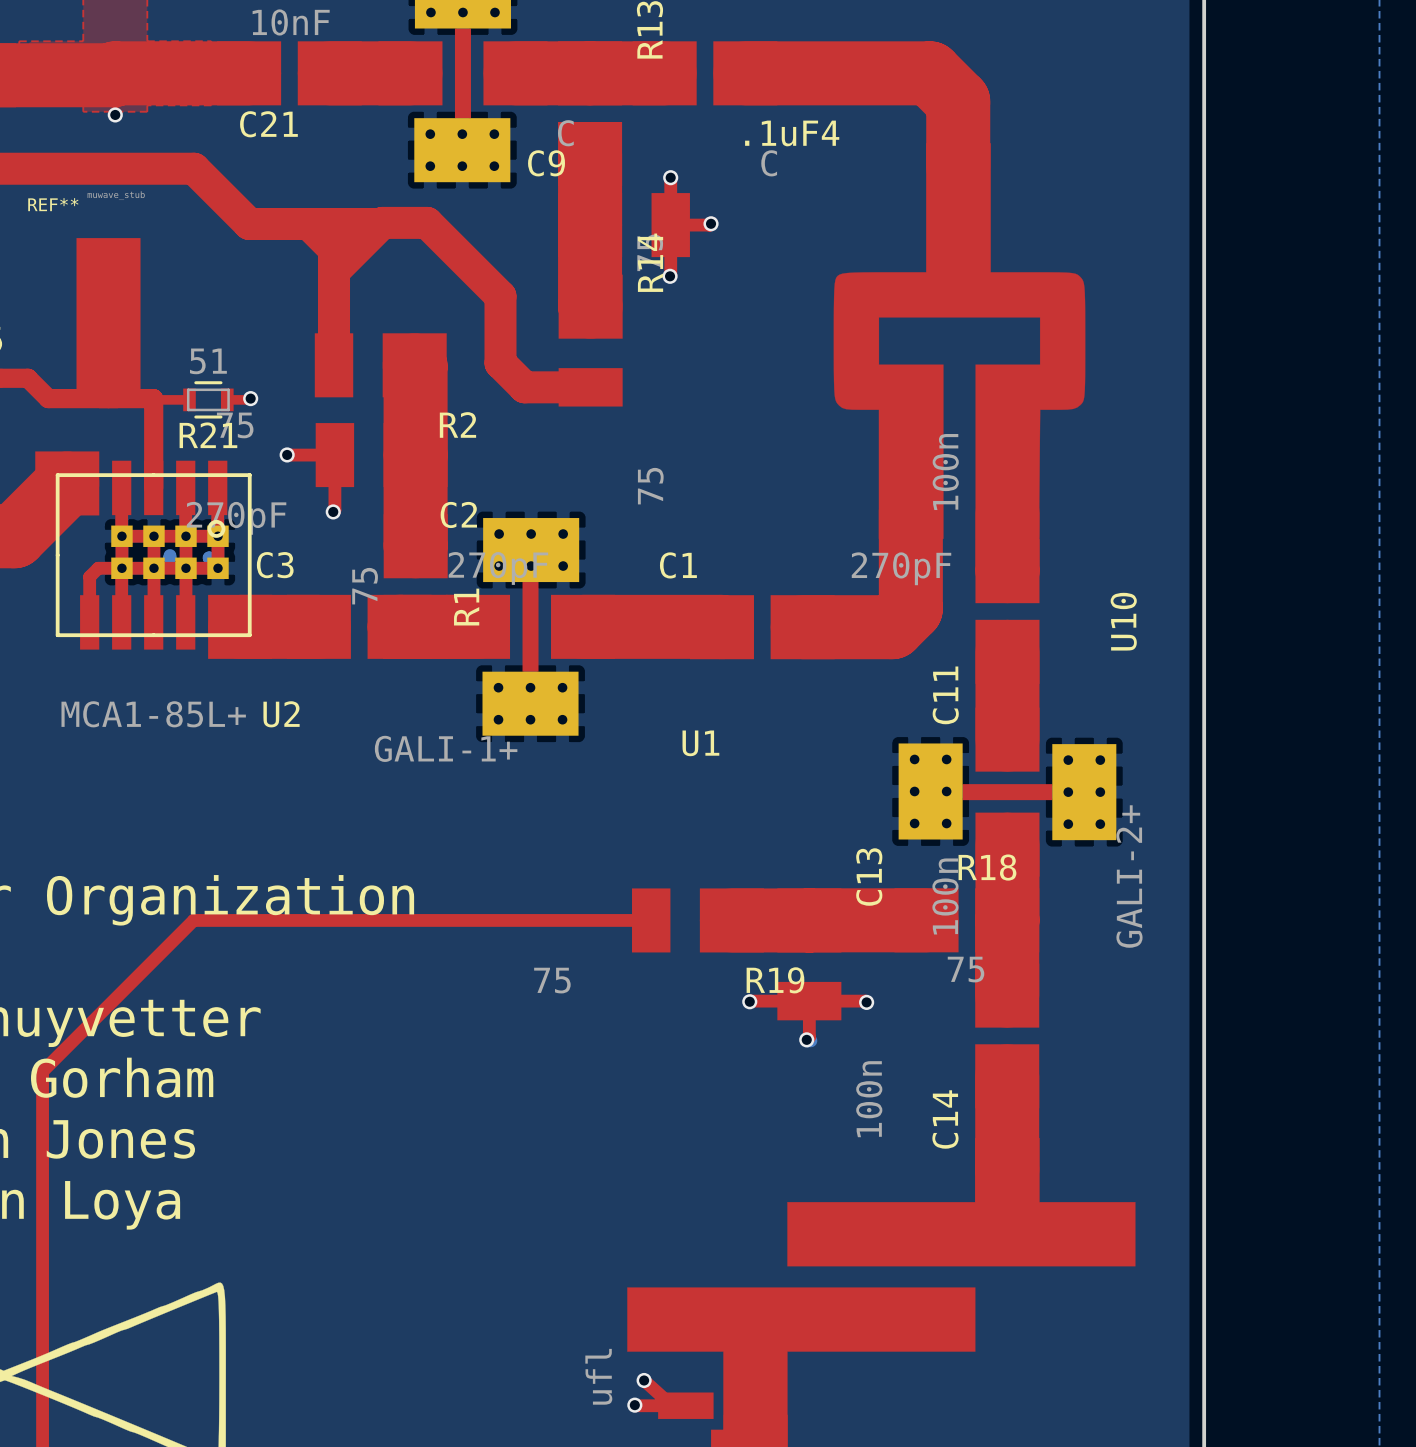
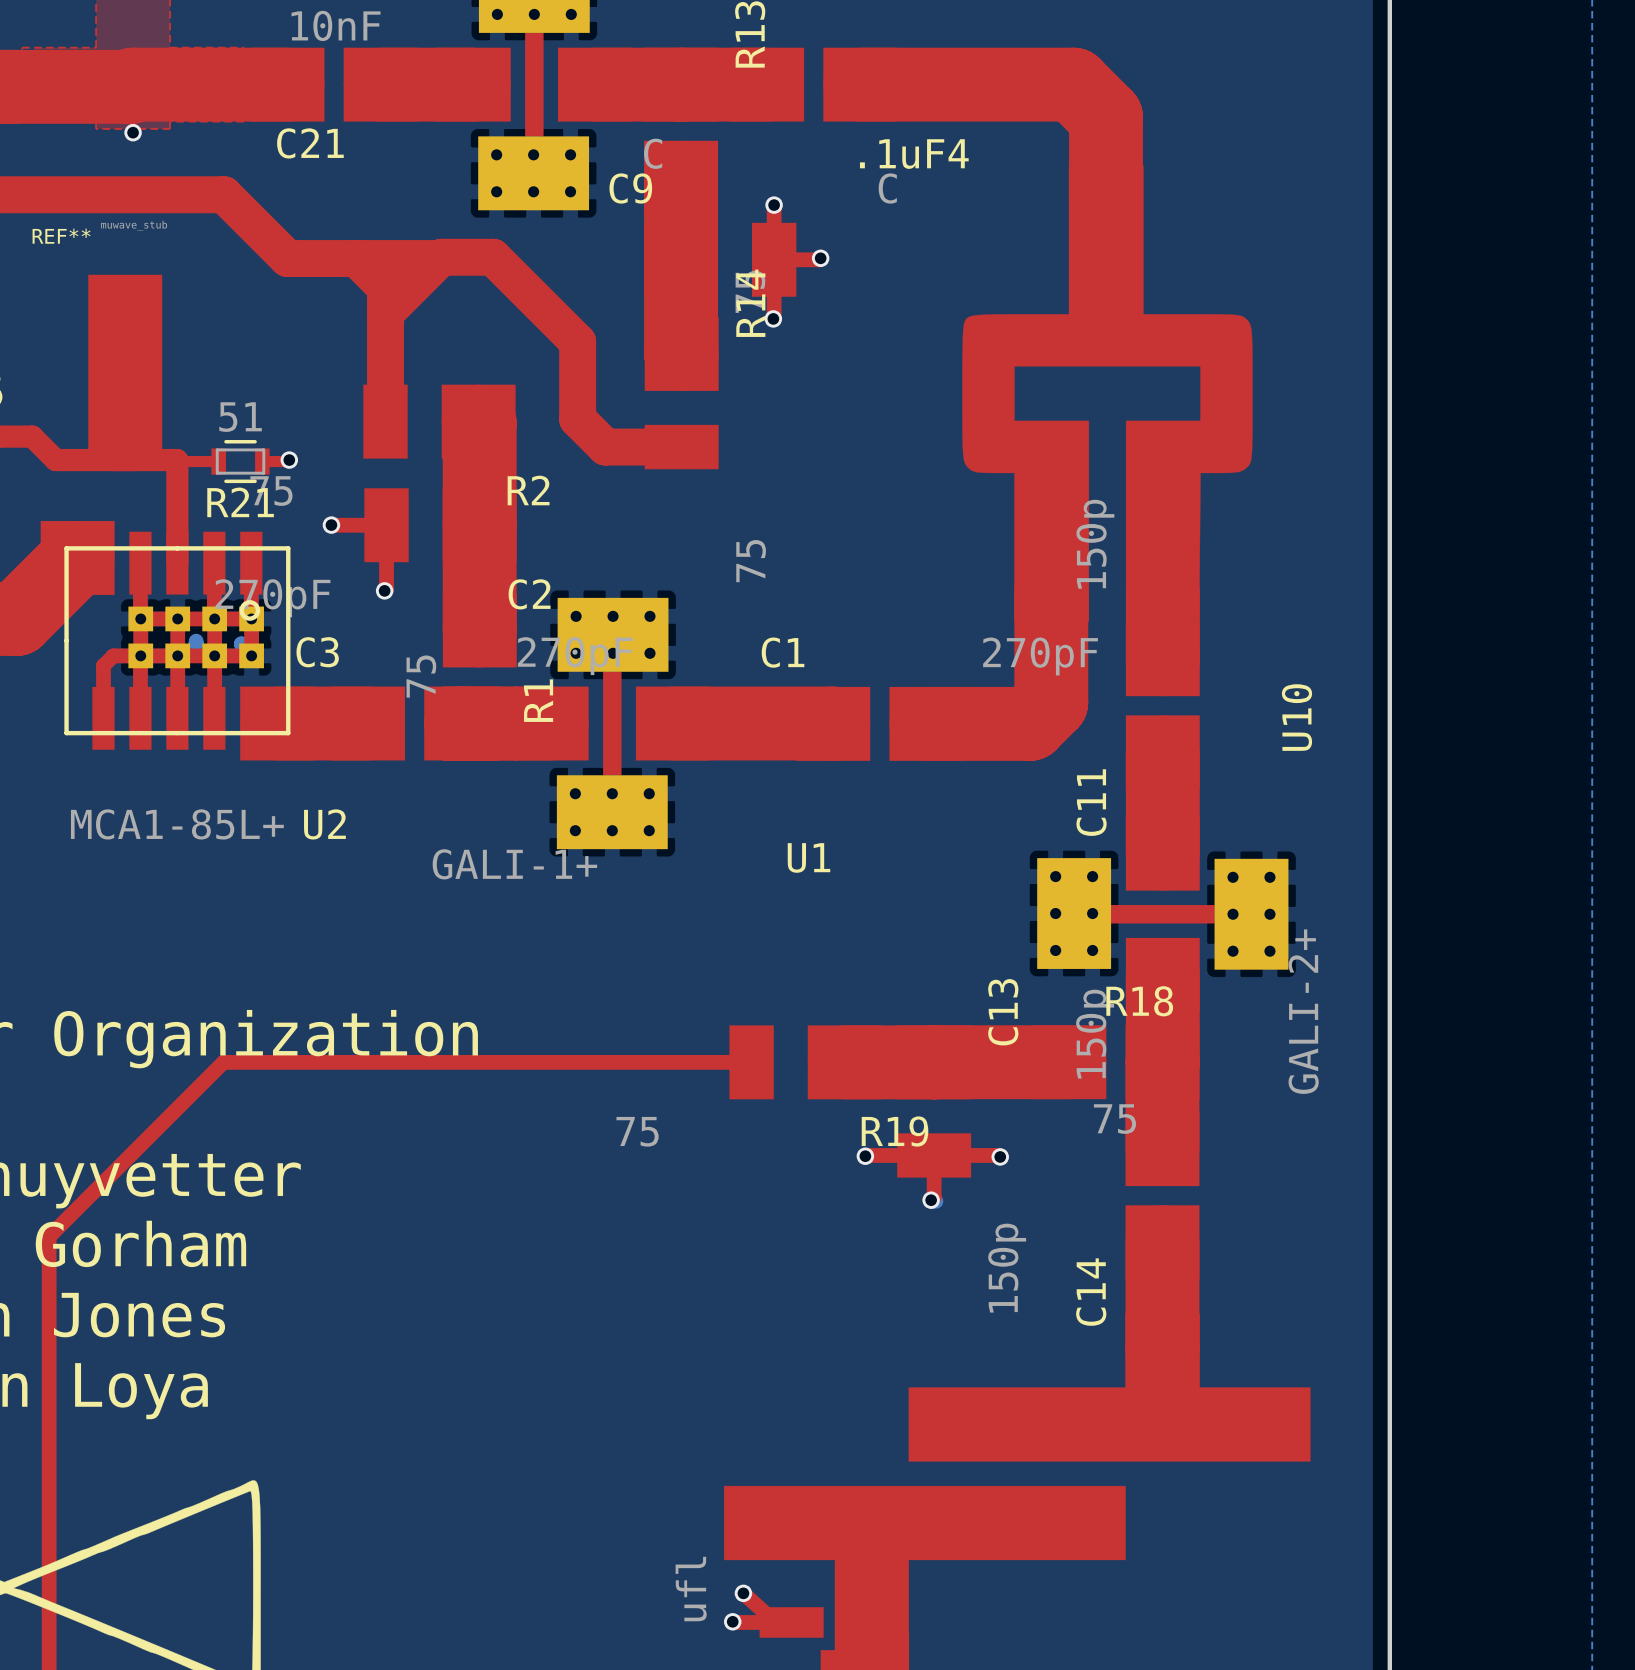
C11 value: 100n (945, 472) -> 150p (1095, 544)
C14 value: 100n (945, 896) -> 150p (1095, 1034)
C13 value: 100n (869, 1099) -> 150p (1007, 1268)

